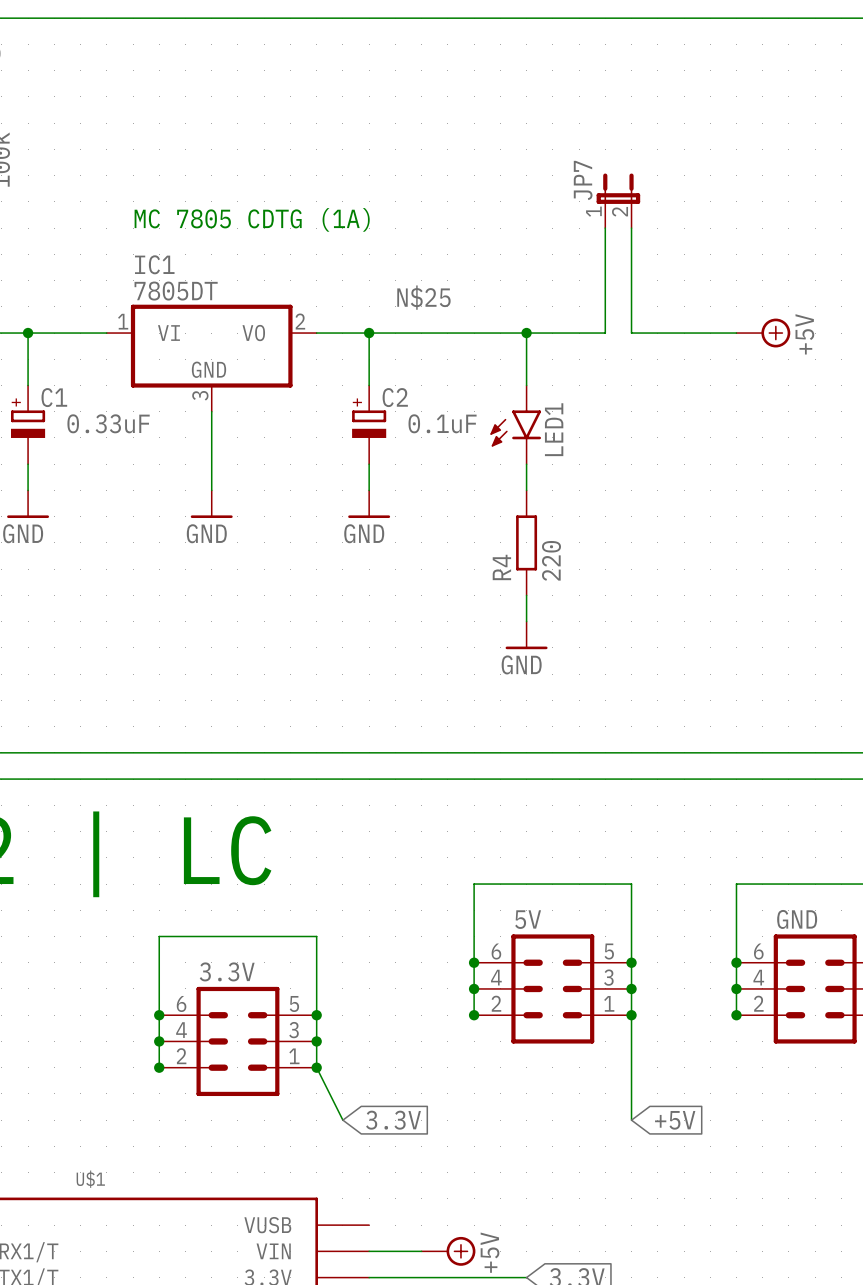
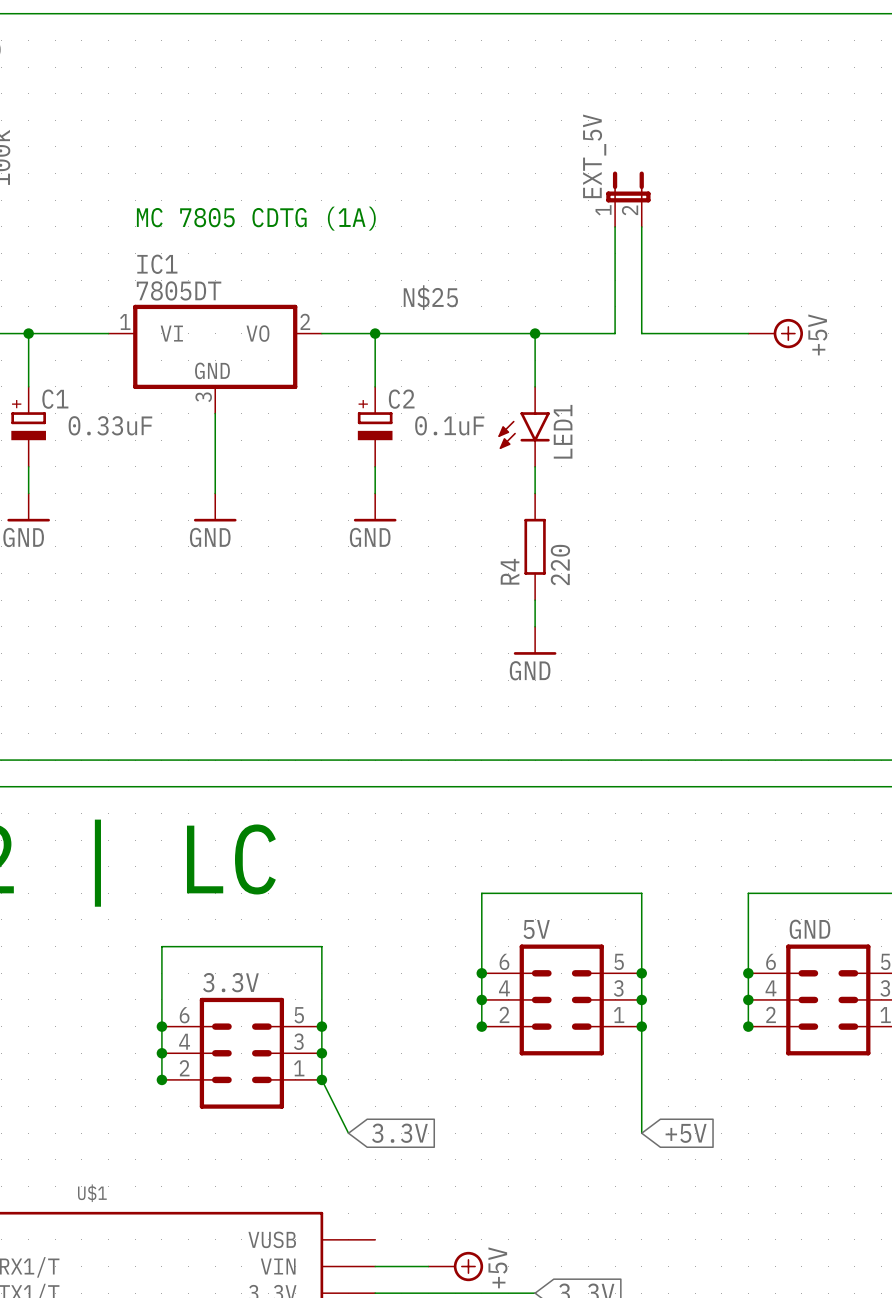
JP7 name: JP7 (583, 180) -> EXT_5V (594, 156)

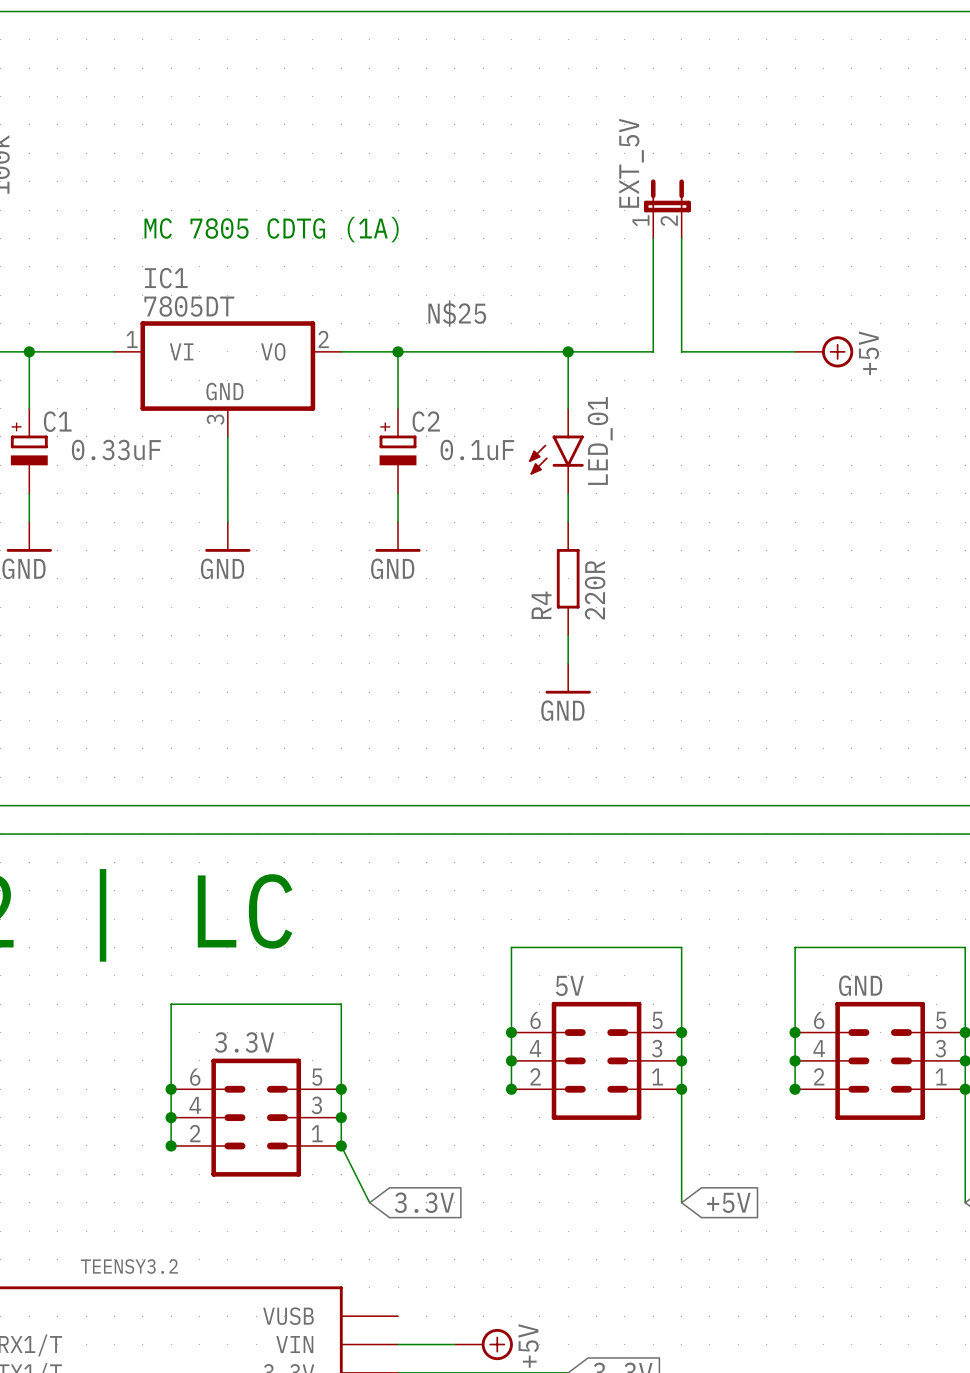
LED1 name: LED1 (563, 431) -> LED_01 (600, 440)
R4 value: 220 (560, 565) -> 220R (595, 590)
U$1 name: U$1 (92, 1193) -> TEENSY3.2 (129, 1266)

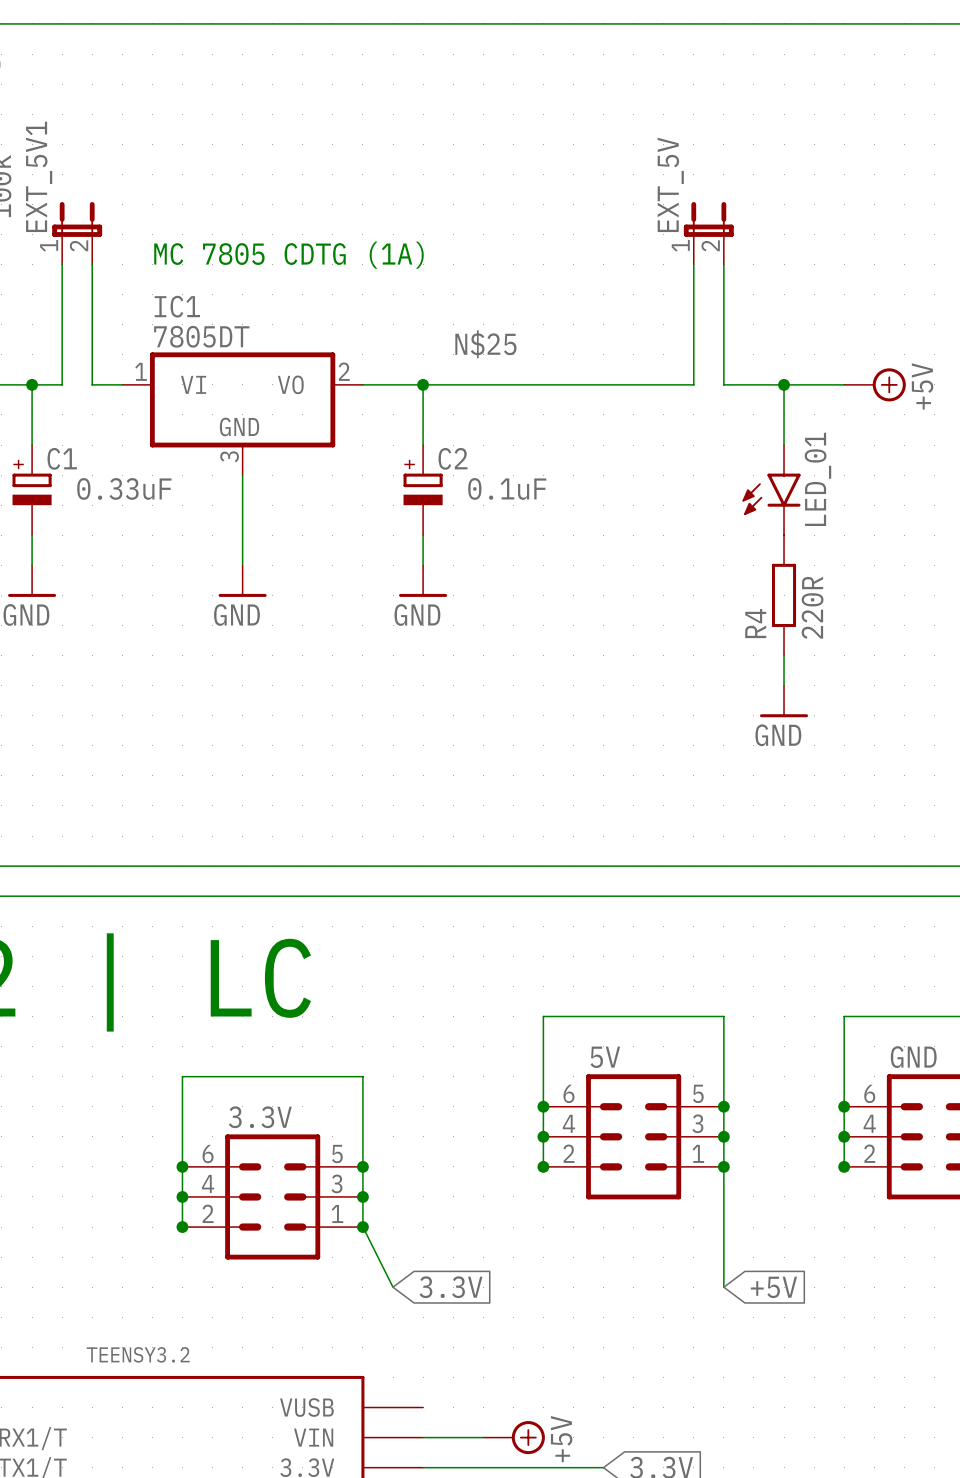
EXT_5V1: none -> (77, 233)
wire: none -> (92, 264) (92, 384)
wire: (57, 351) (86, 351) -> (62, 384) (62, 264)
wire: (568, 351) (568, 408) -> (784, 384) (784, 445)
junction: (568, 351) -> none
junction: none -> (784, 384)
LED_01 position: (556, 451) -> (771, 490)
wire: (568, 493) (568, 522) -> none
R4 position: (568, 578) -> (784, 595)
wire: (568, 635) (568, 663) -> (784, 655) (784, 685)
power symbol position: GND (568, 678) -> GND (784, 701)

